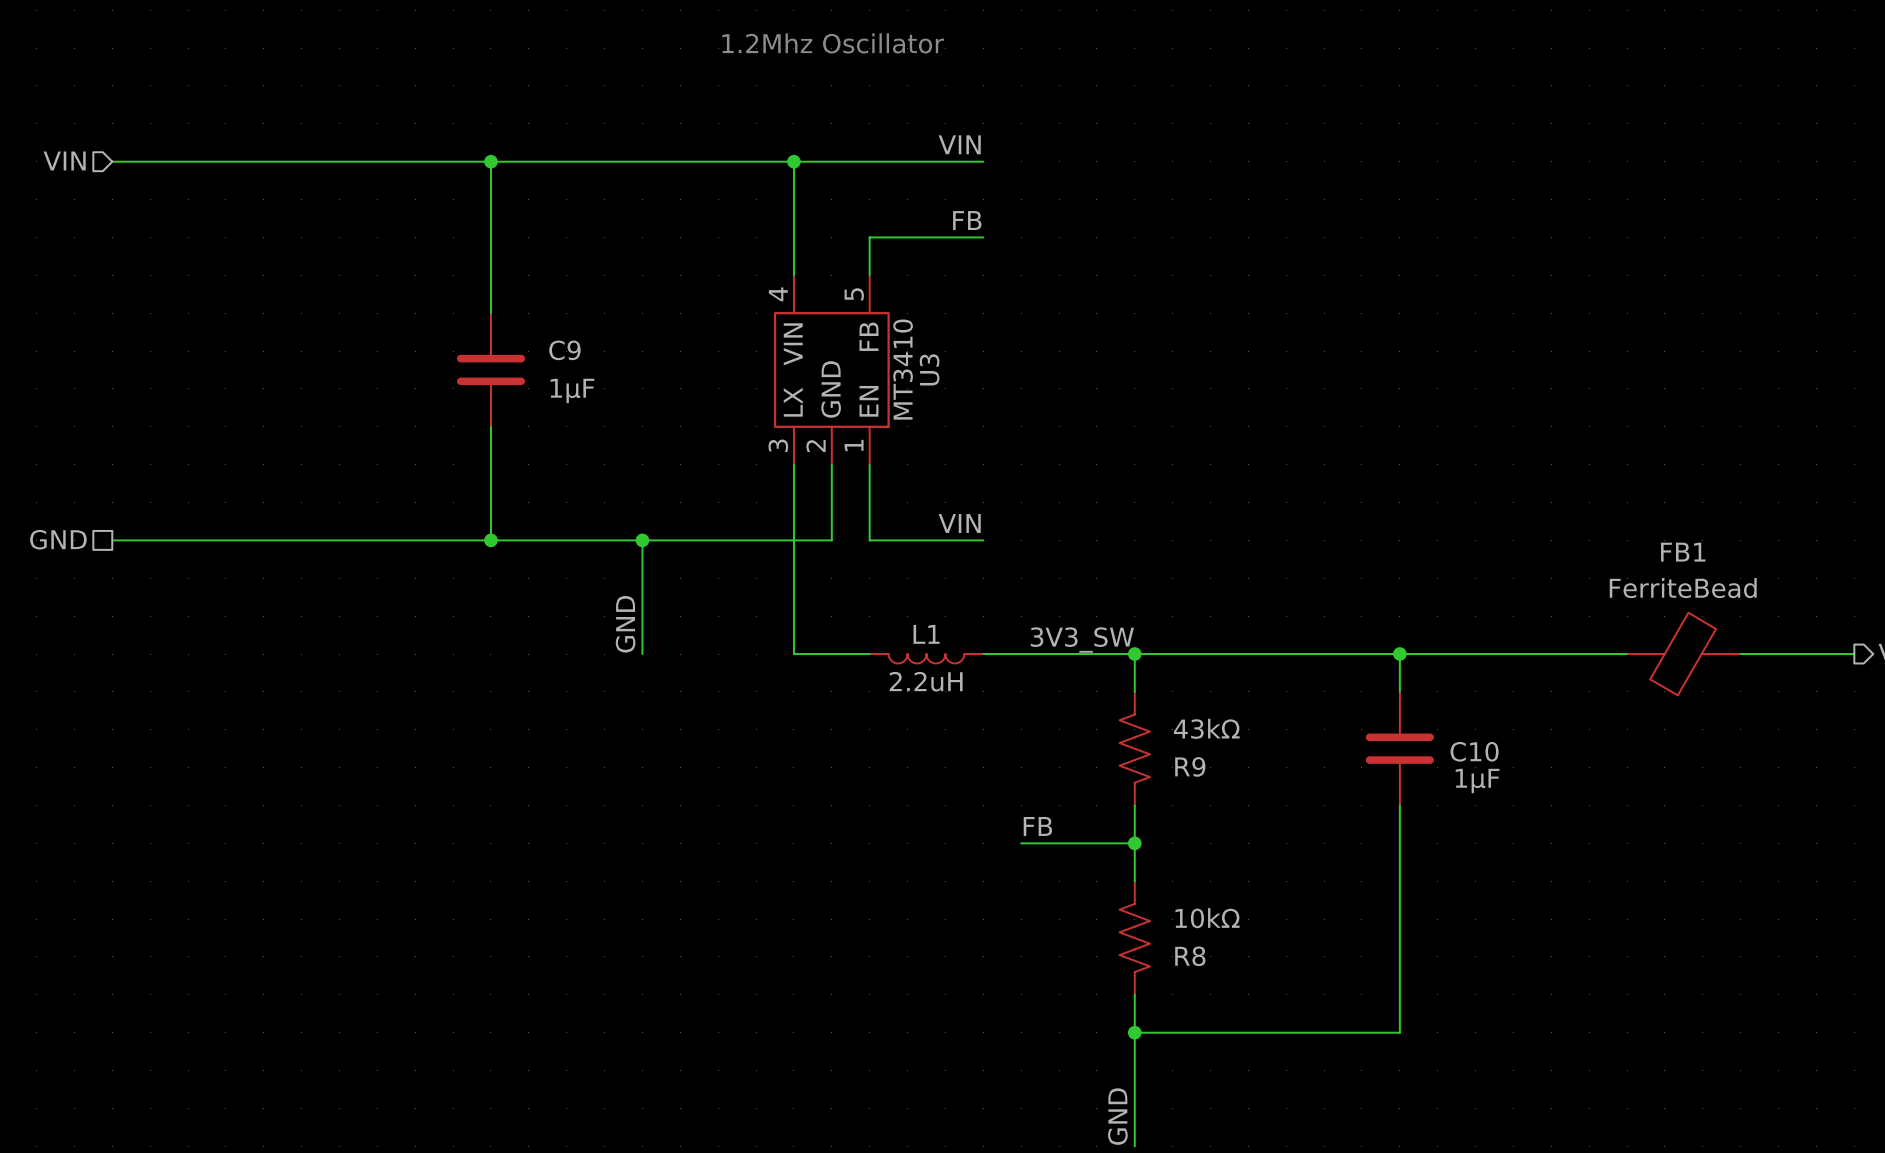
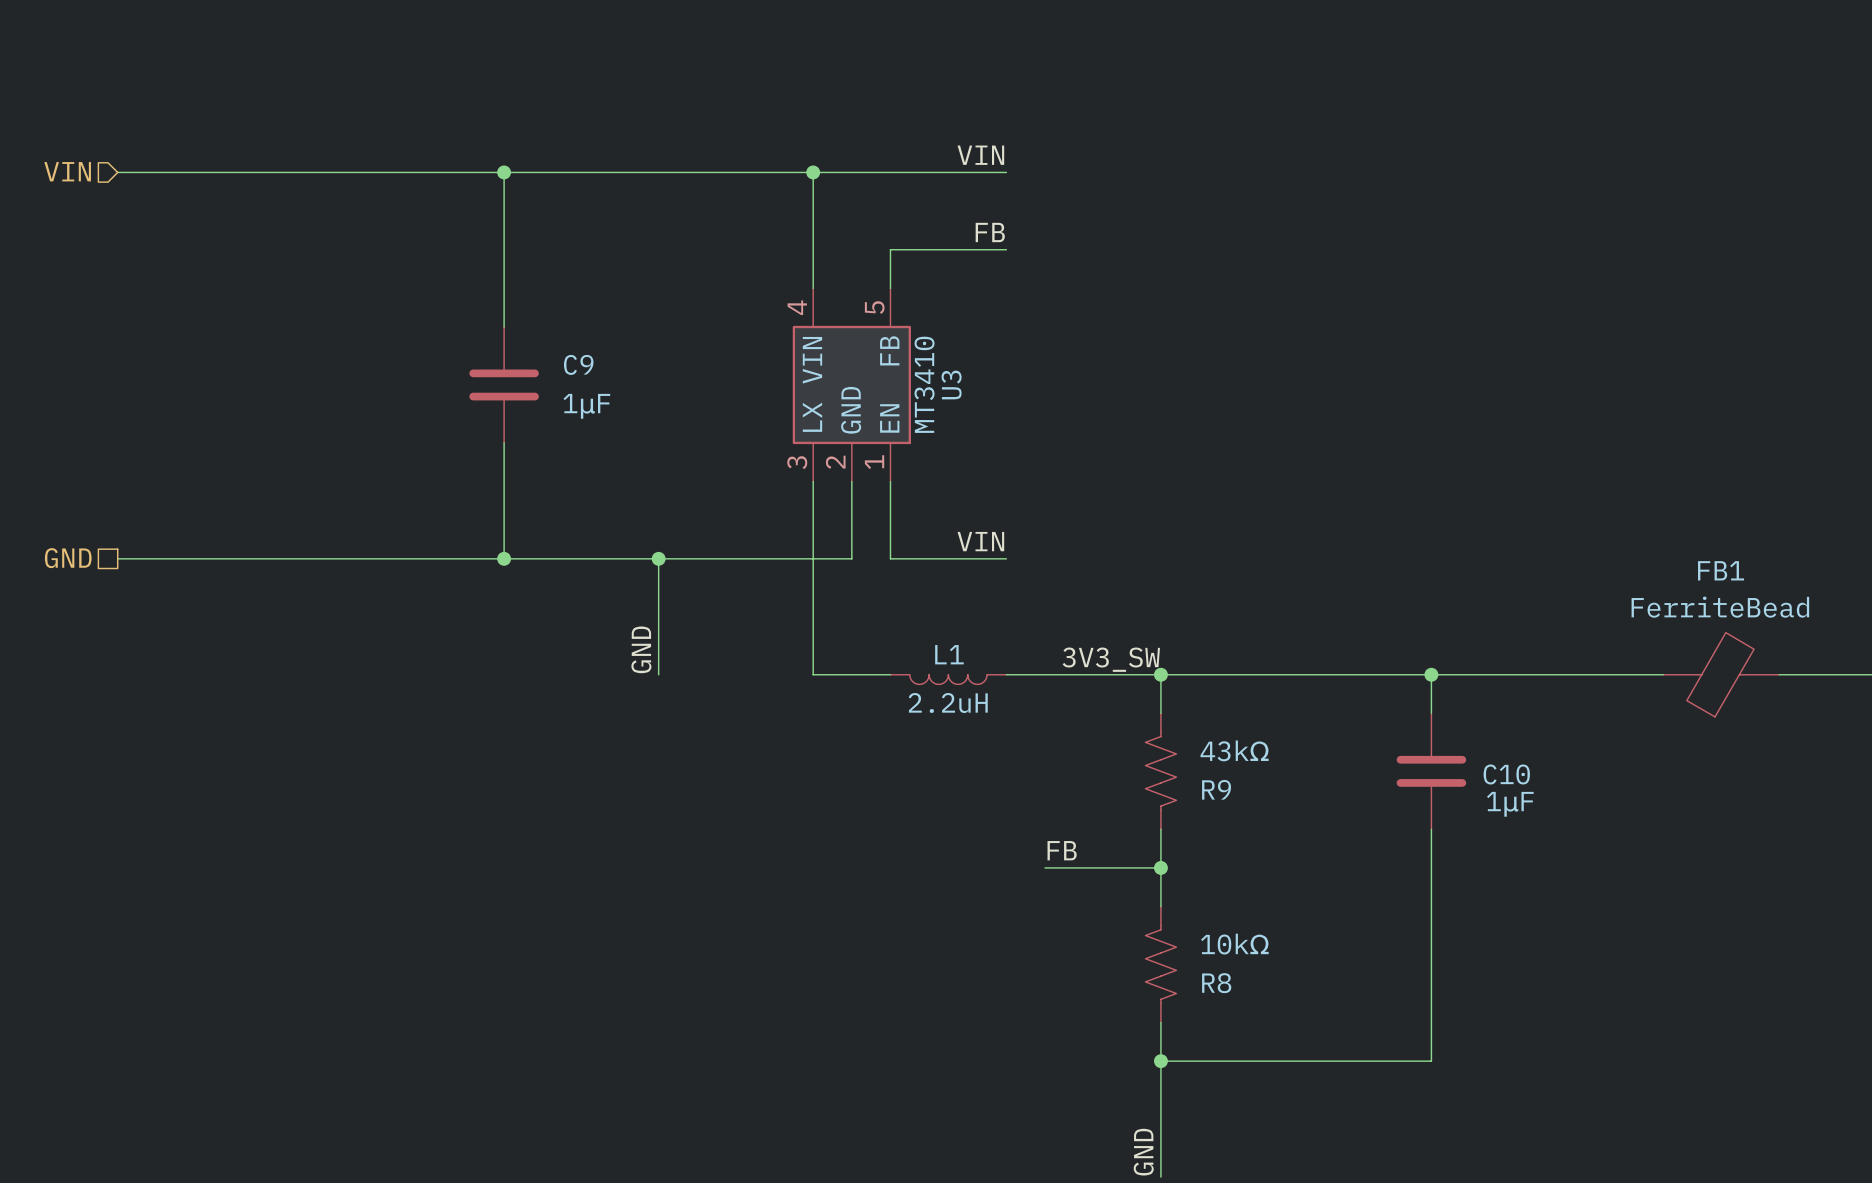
text: 1.2Mhz Oscillator (833, 43) -> none

